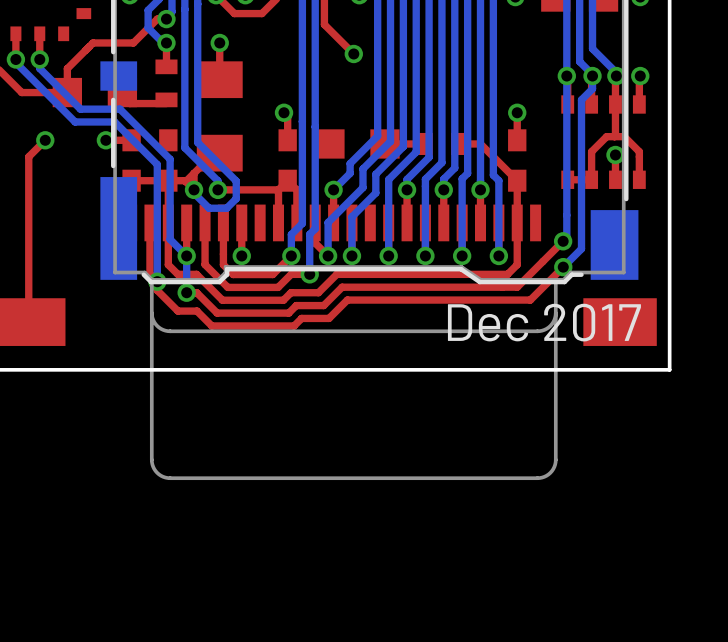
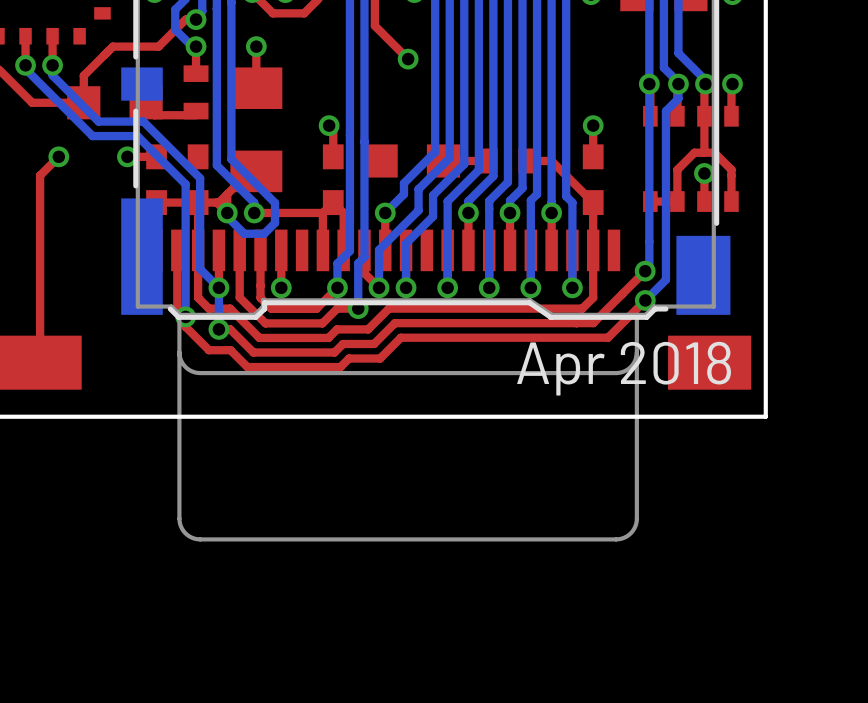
text: Dec 2017 (544, 322) -> Apr 2018 (624, 368)

